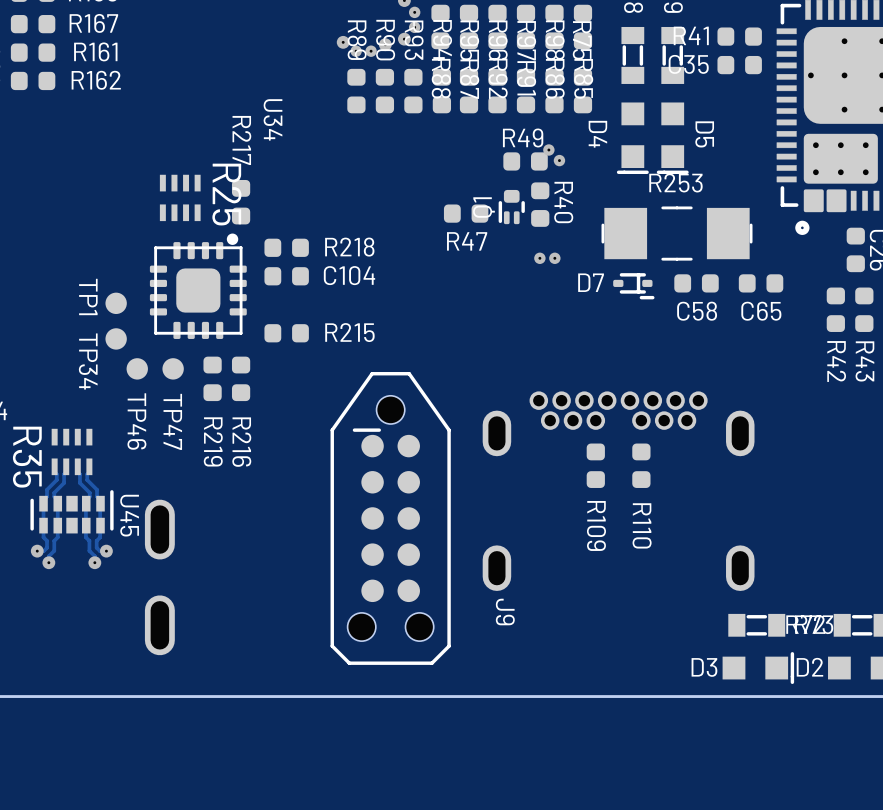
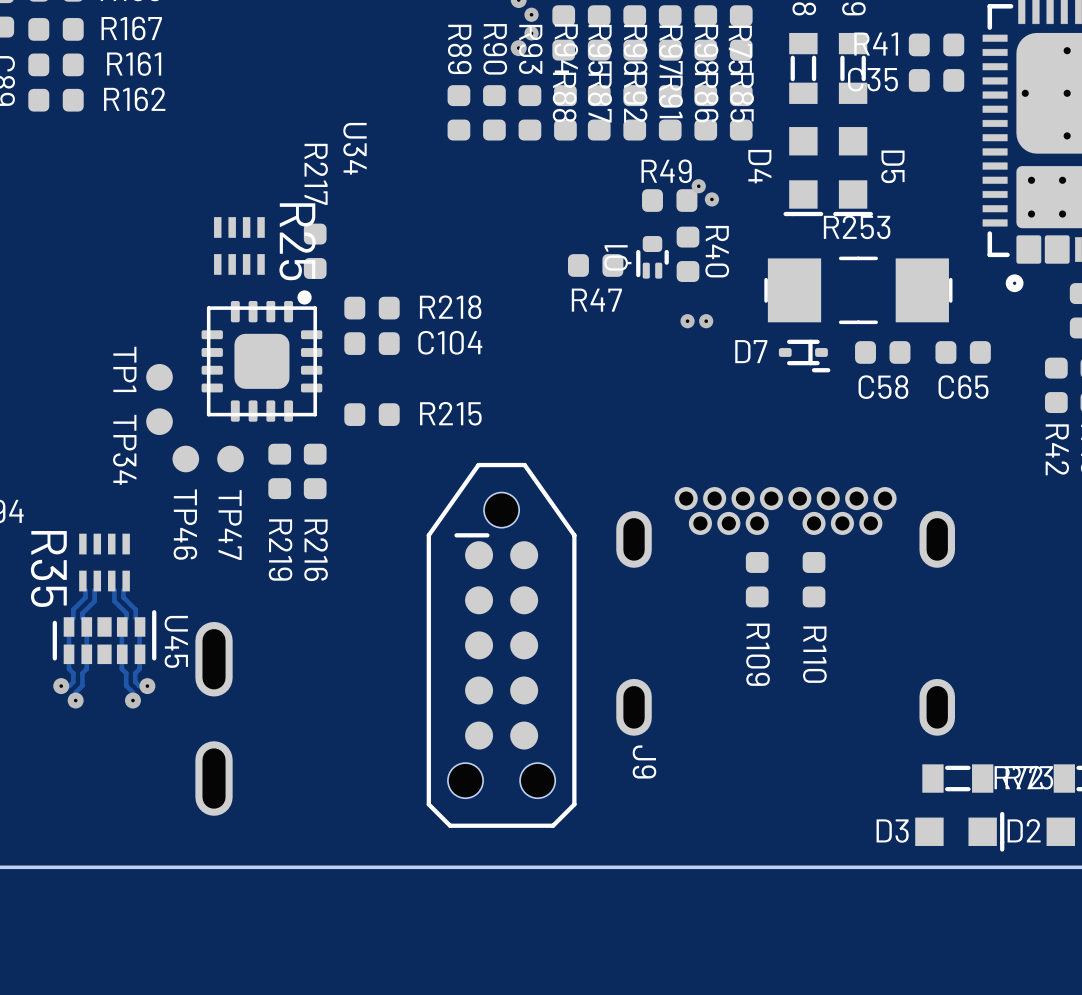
via: (343, 42) -> none
via: (385, 44) -> none
via: (356, 51) -> none
via: (371, 51) -> none

